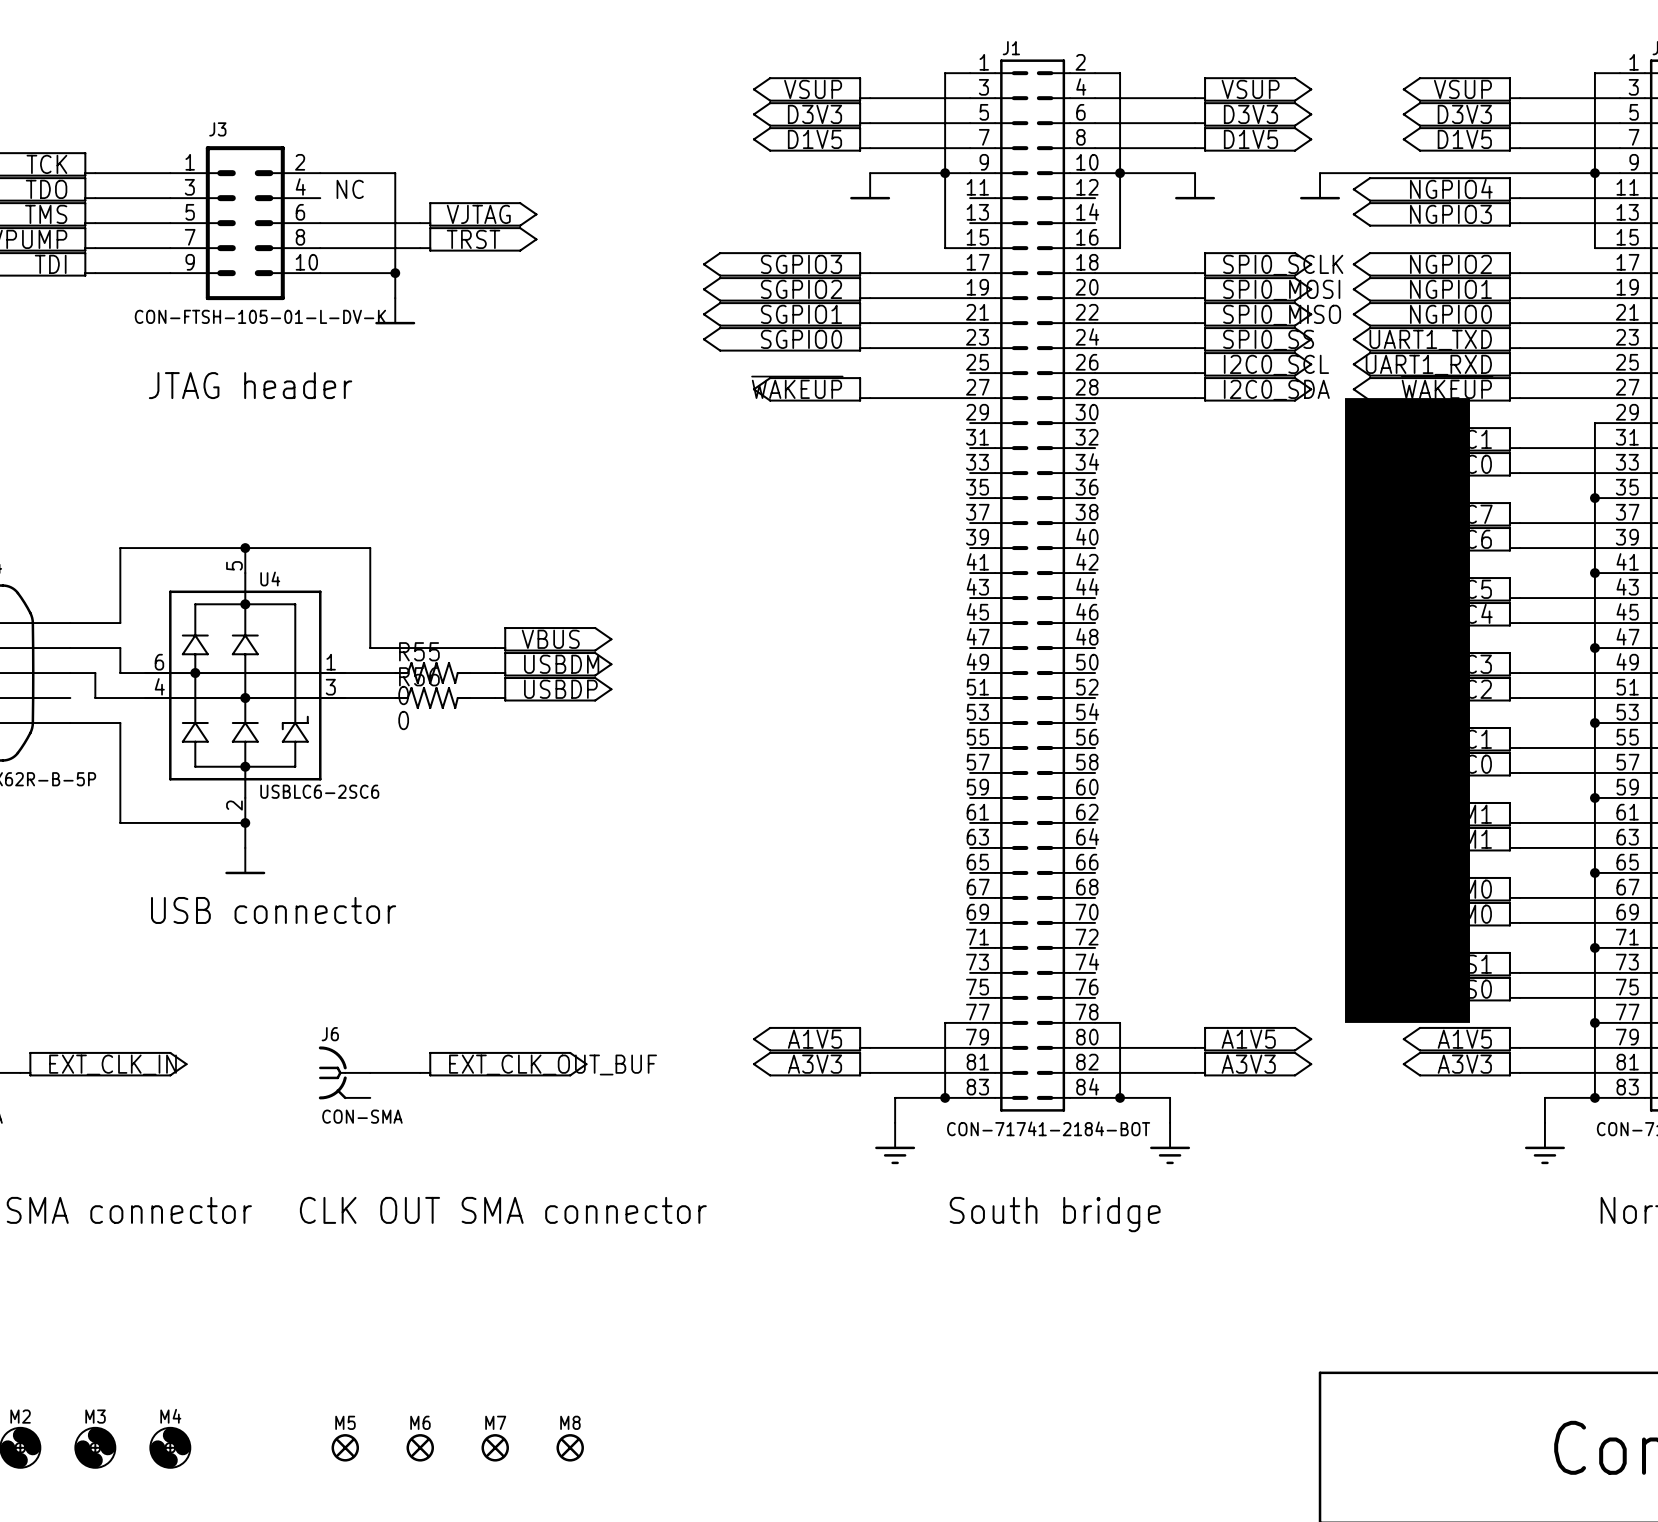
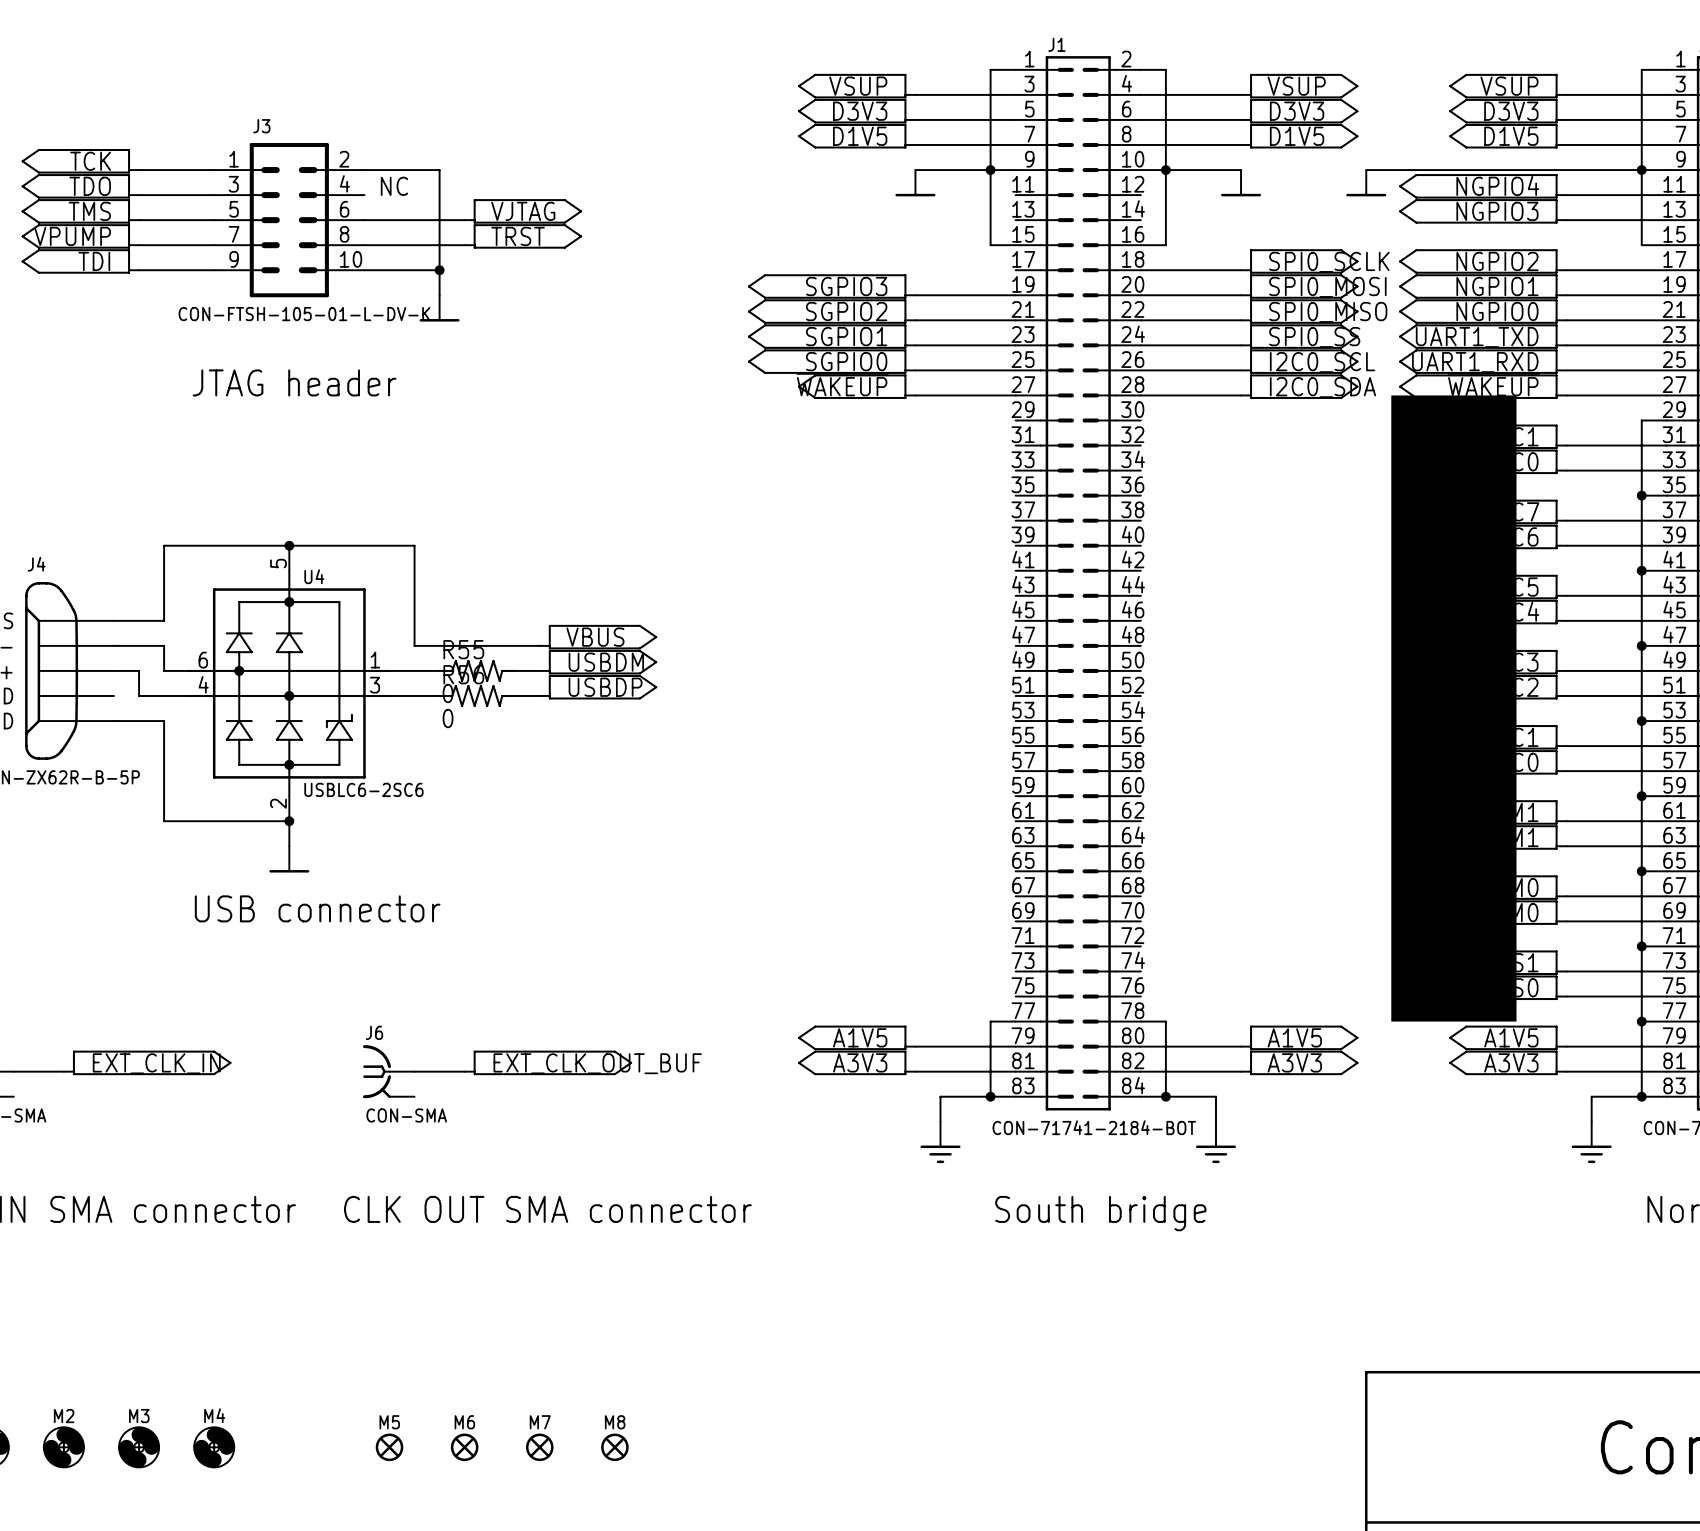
part position: (786, 264) -> (832, 361)
label: SGPIO3 (801, 264) -> none
wire: (870, 273) (970, 273) -> (915, 370) (1015, 370)
label: SGPIO2 (801, 289) -> SGPIO3 (846, 286)
label: SGPIO1 (801, 314) -> SGPIO2 (846, 311)
label: SGPIO0 (801, 339) -> SGPIO1 (846, 336)
label: none -> SGPIO0 (846, 361)

